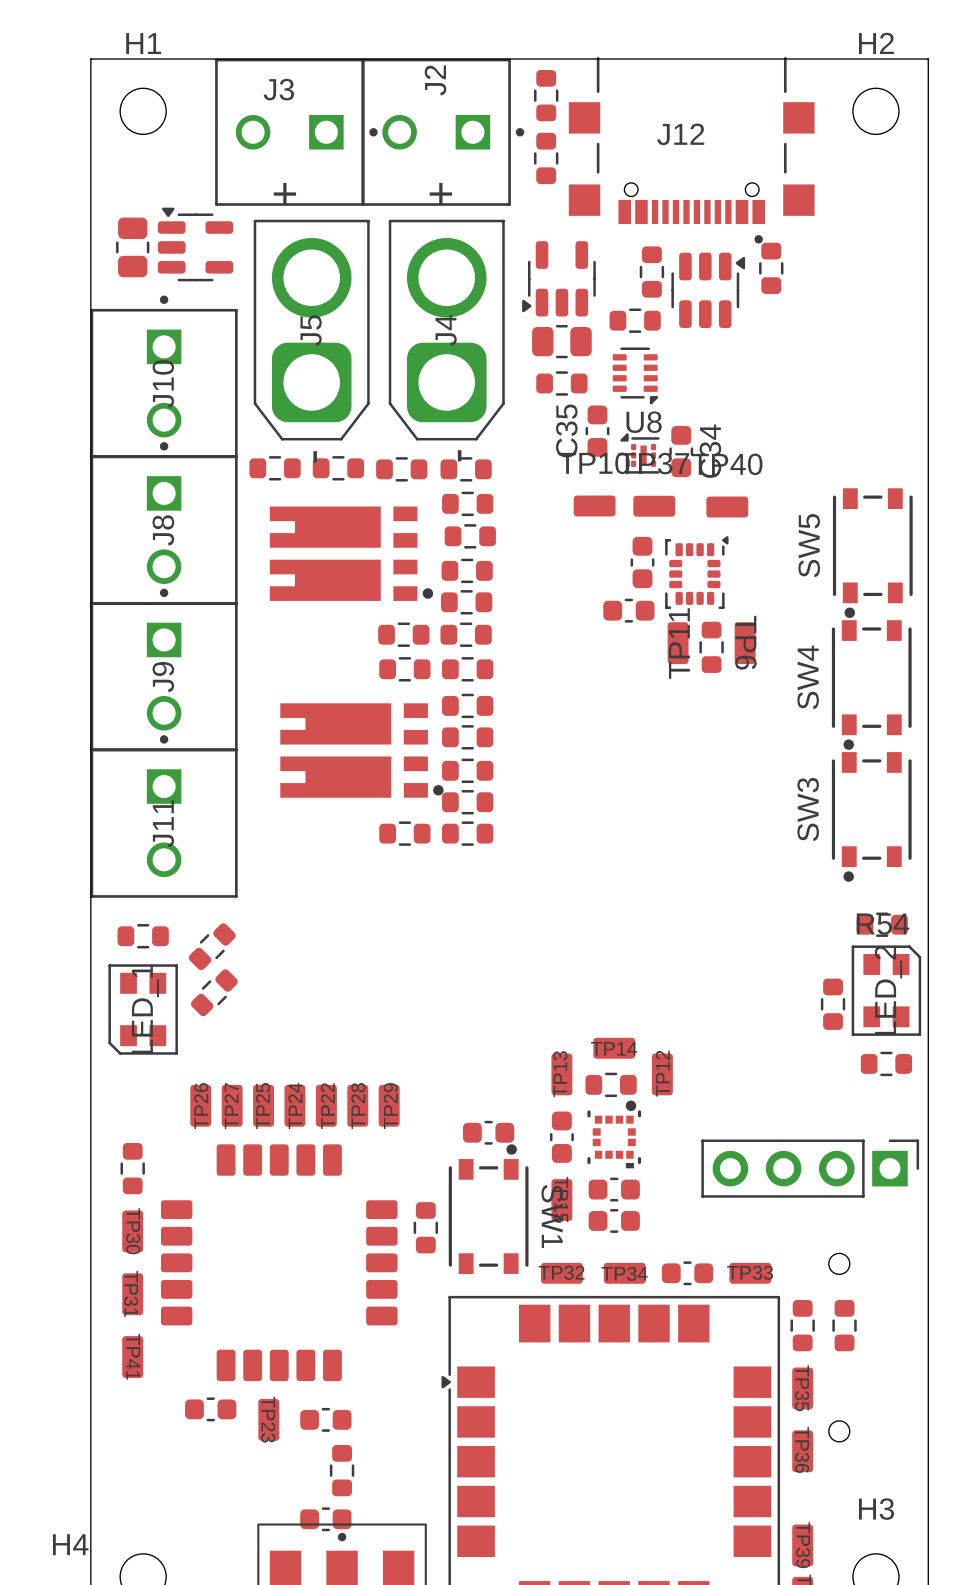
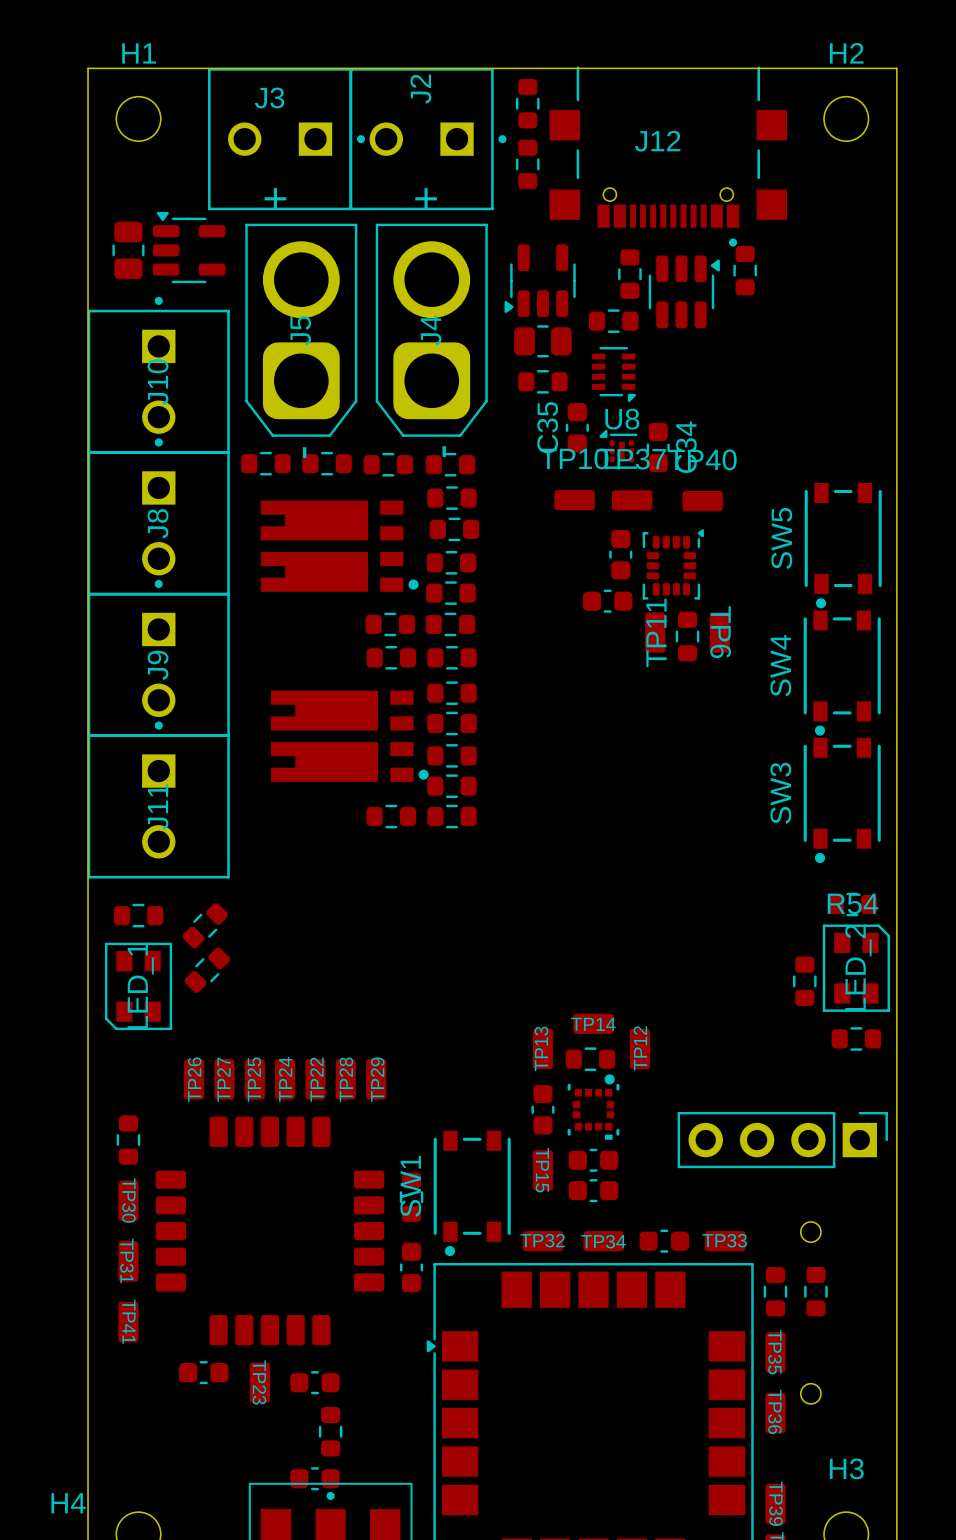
part rotation: 0° (488, 1132) -> 90° clockwise (411, 1267)
part position: (488, 1132) -> (411, 1267)
SW1 rotation: 0° (488, 1209) -> 180° (472, 1193)

